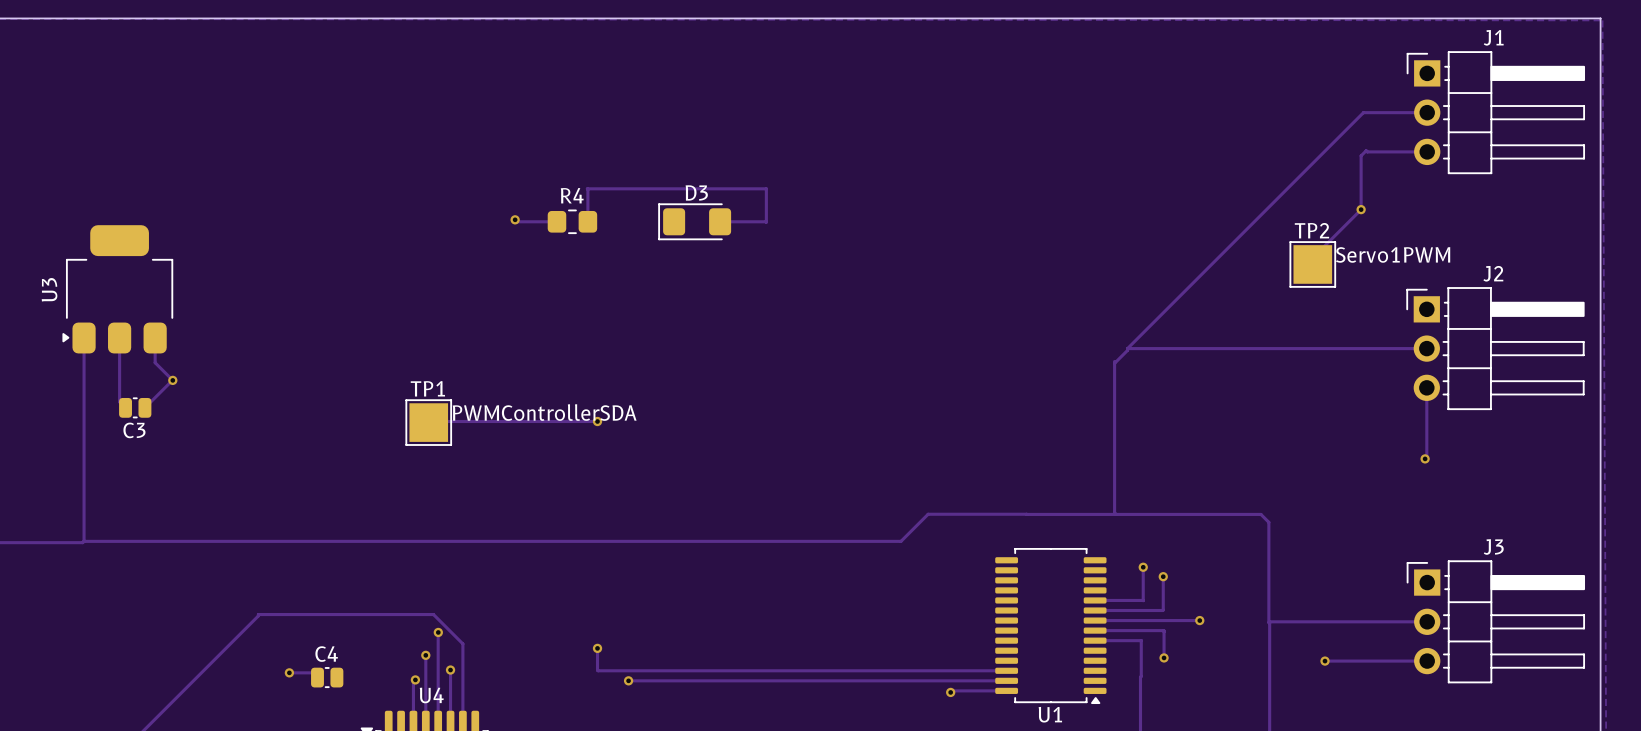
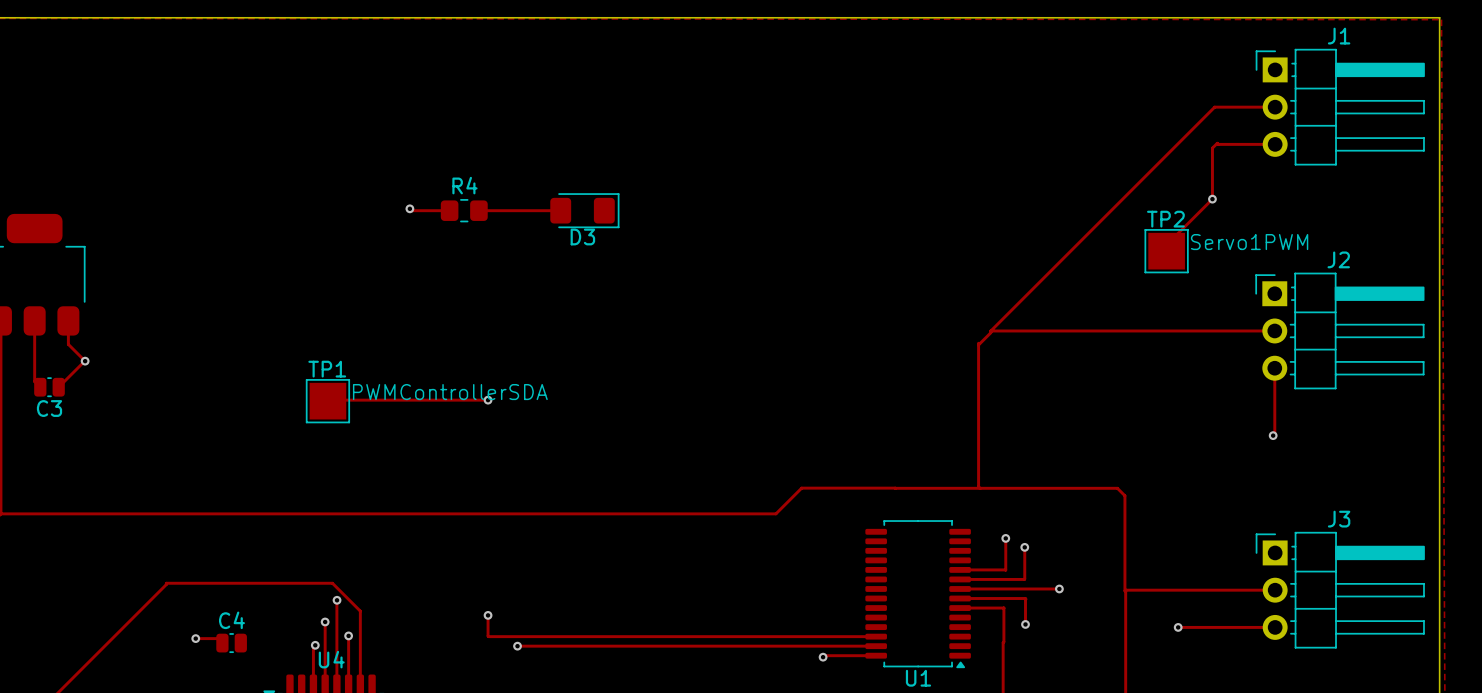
track: (587, 221) (587, 188) (766, 188) (766, 222) (720, 221) -> (478, 210) (560, 210)
D3 rotation: 0° (694, 221) -> 180° (584, 210)

